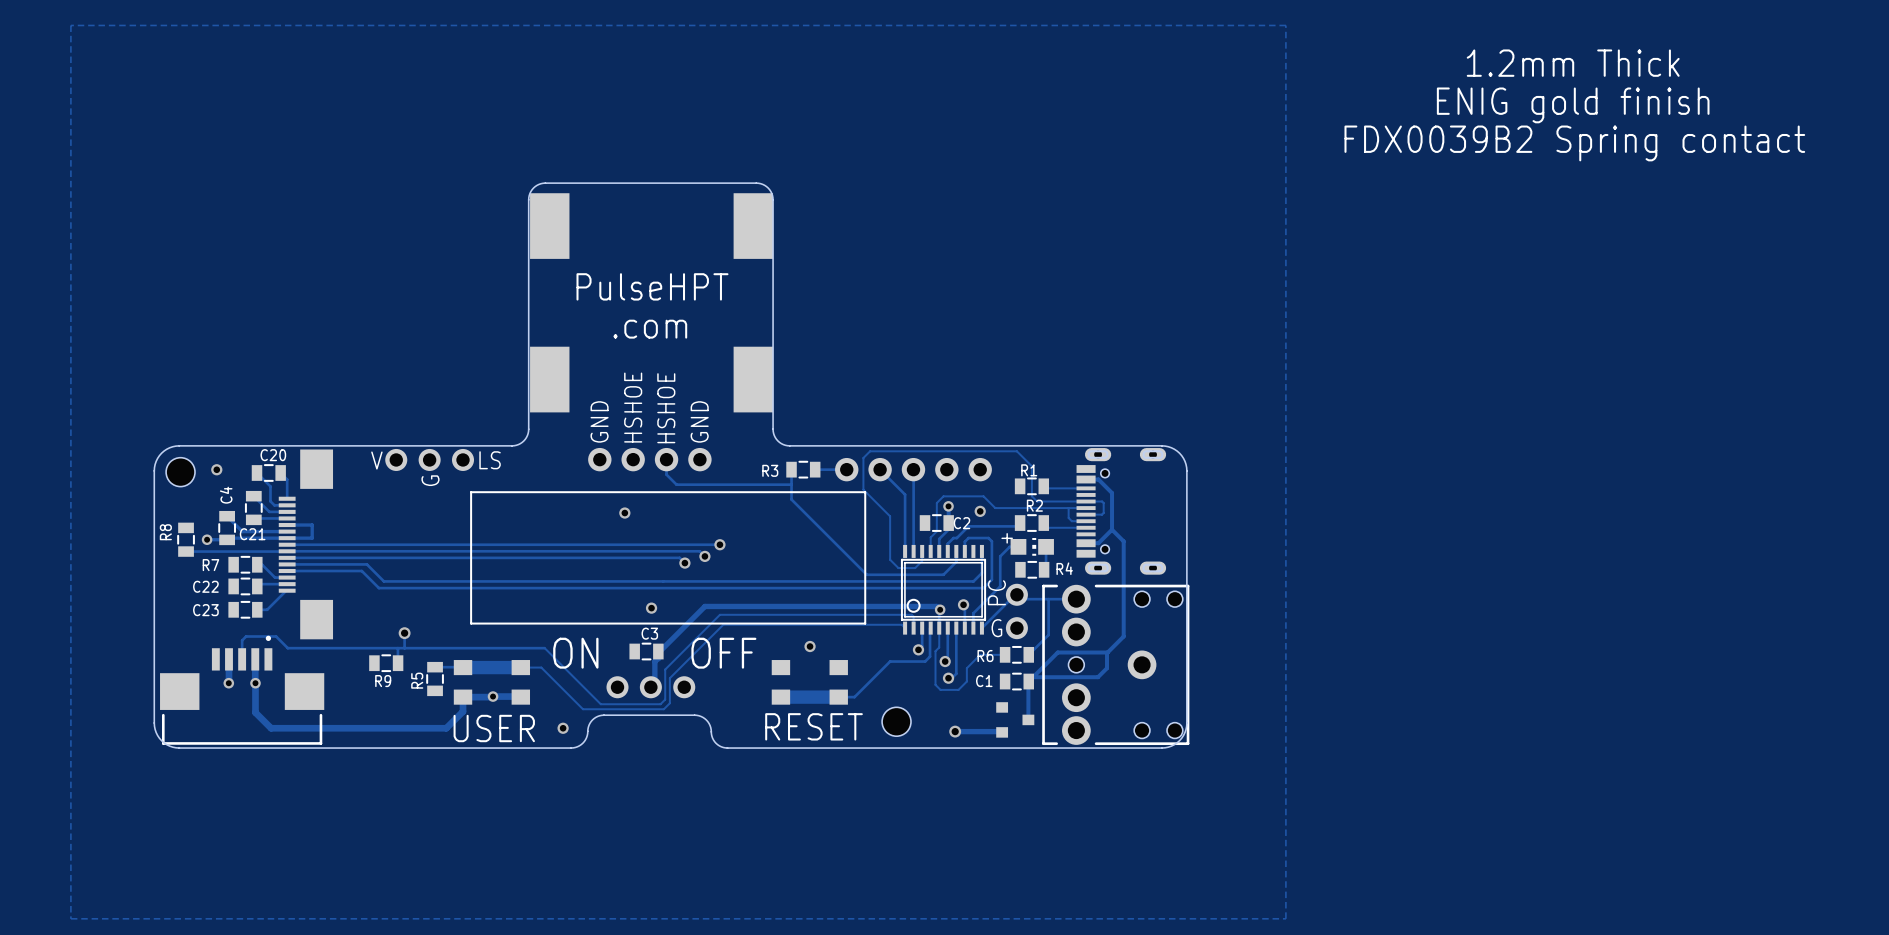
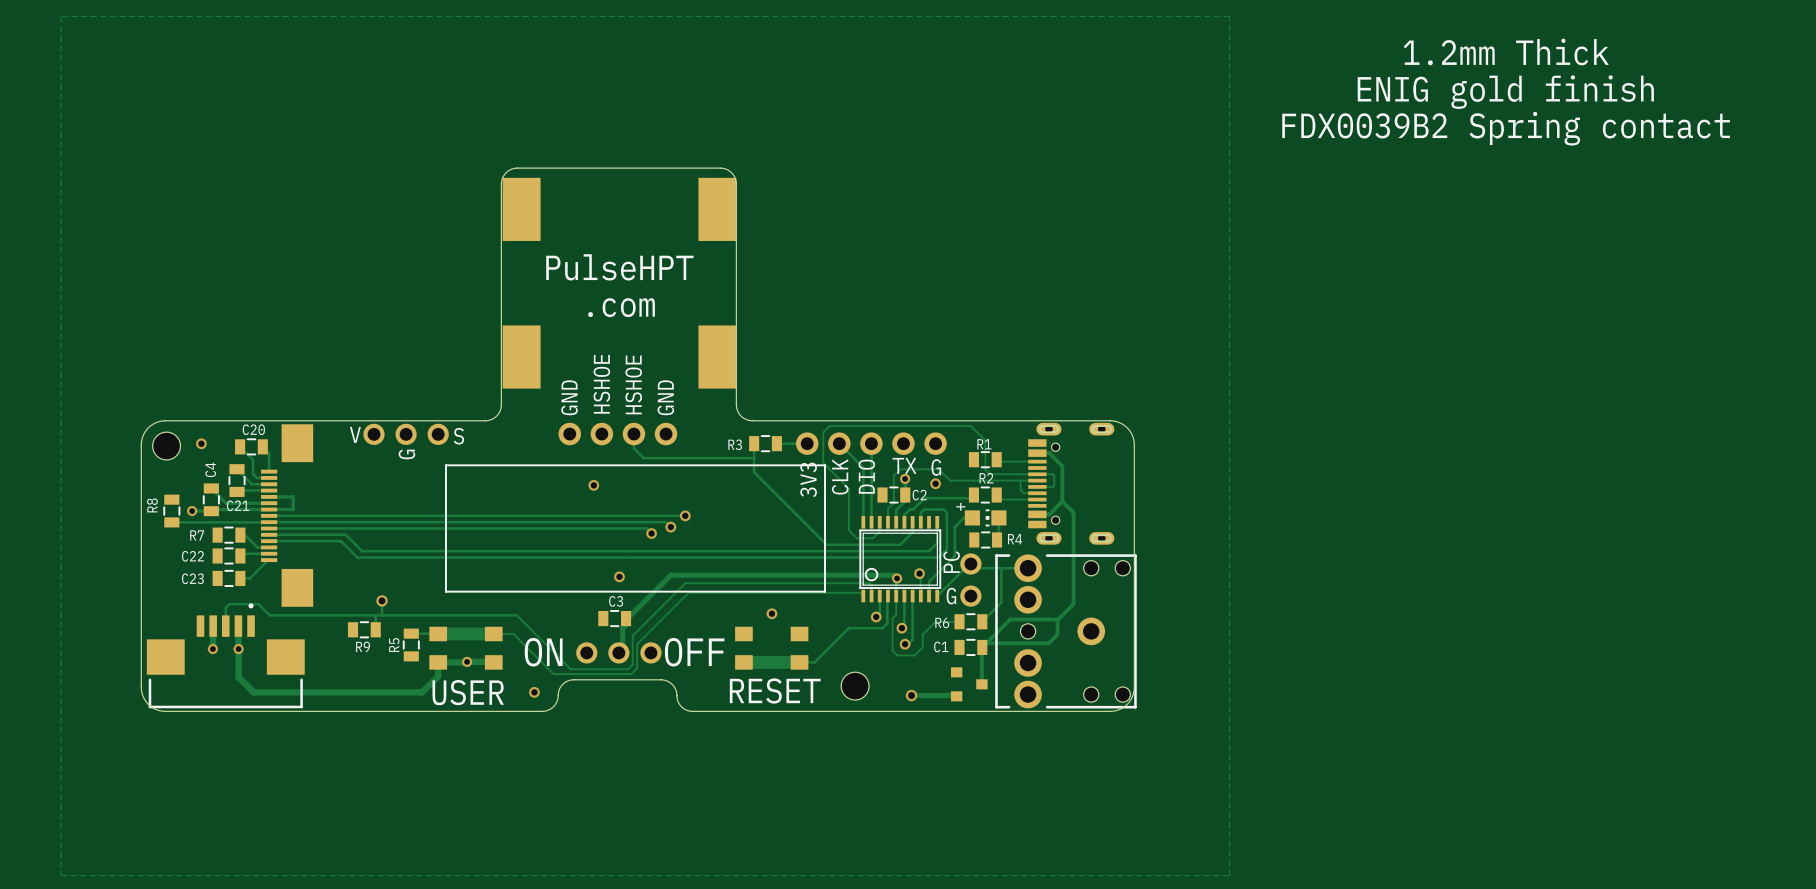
text: LS (490, 460) -> S (458, 436)
text: none -> TX (904, 465)
text: none -> G (936, 467)
text: none -> CLK (840, 476)
text: none -> DIO (866, 476)
text: none -> 3V3 (808, 479)
text position: ON (575, 653) -> ON (543, 652)
text position: OFF (723, 653) -> OFF (694, 652)

